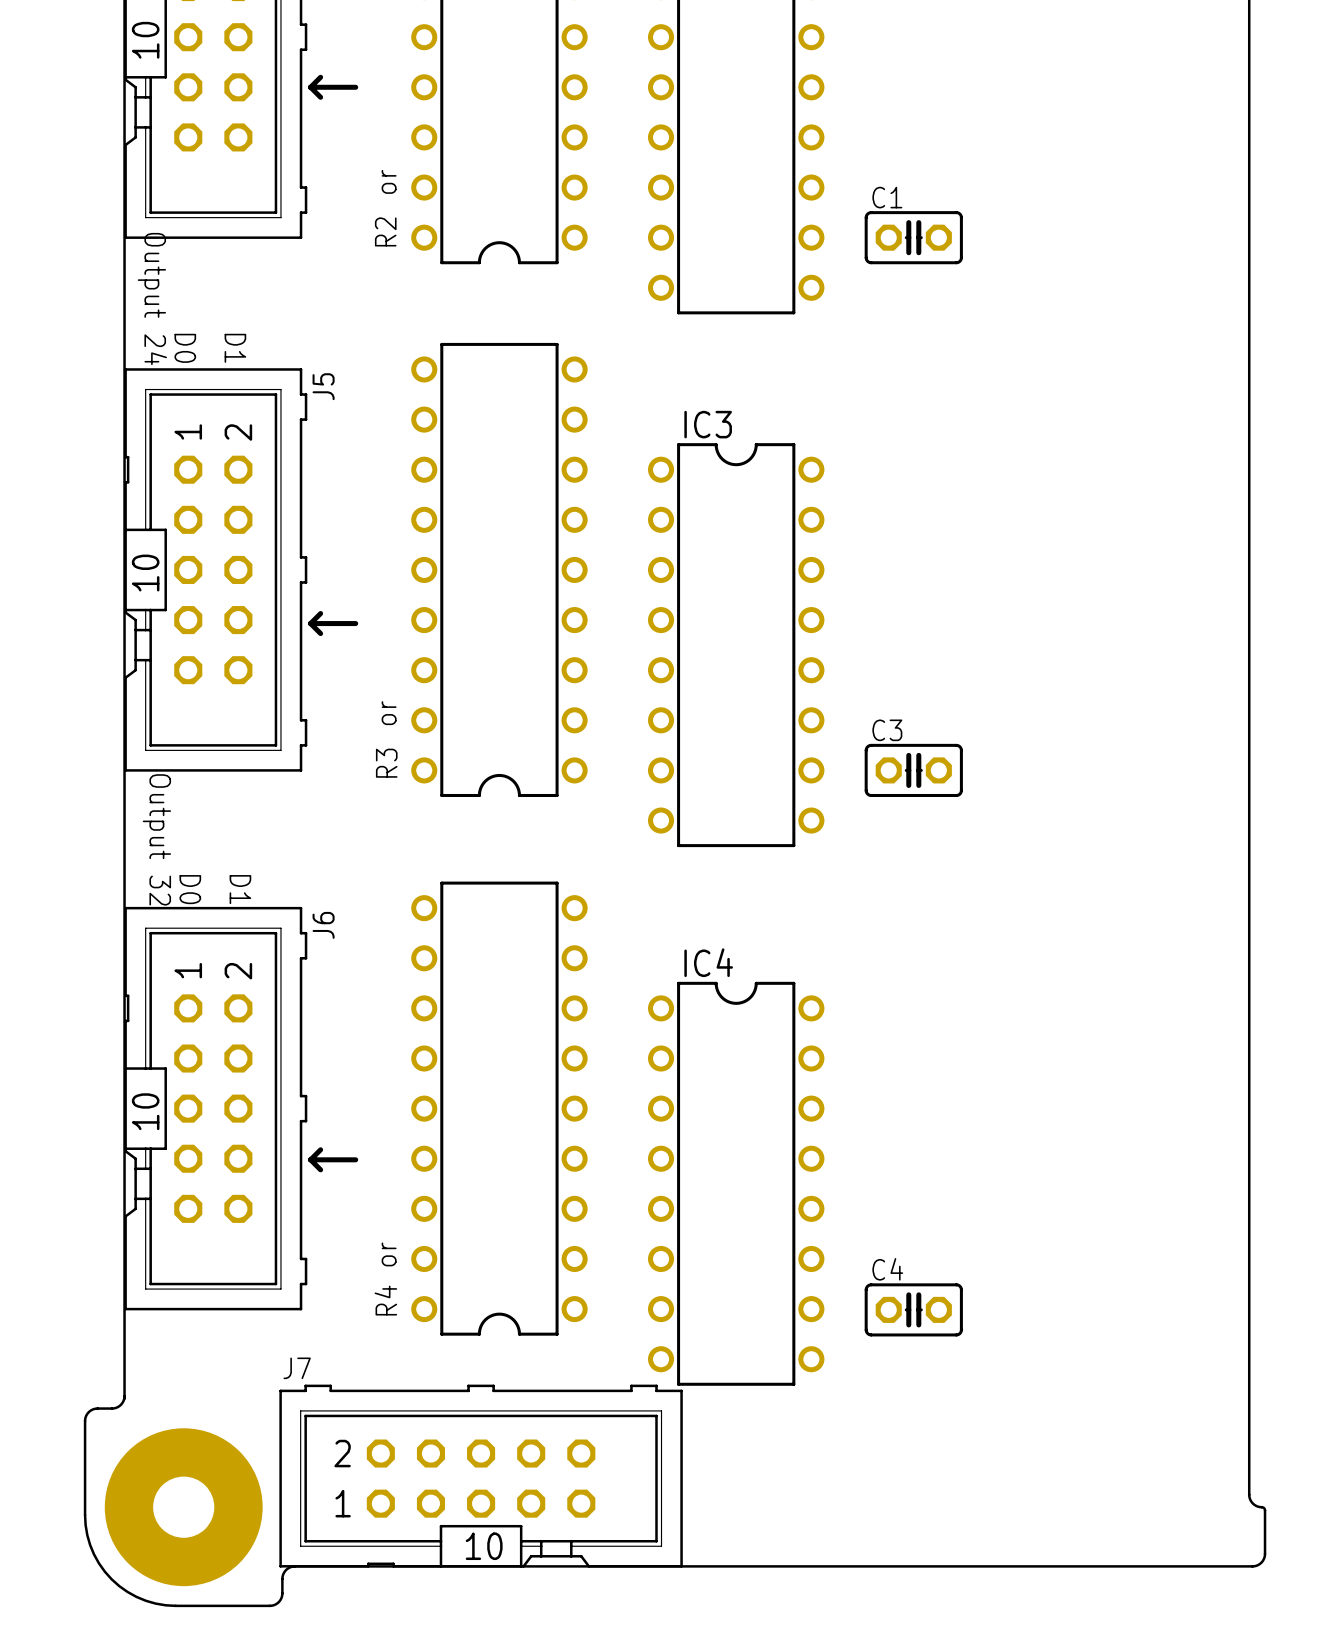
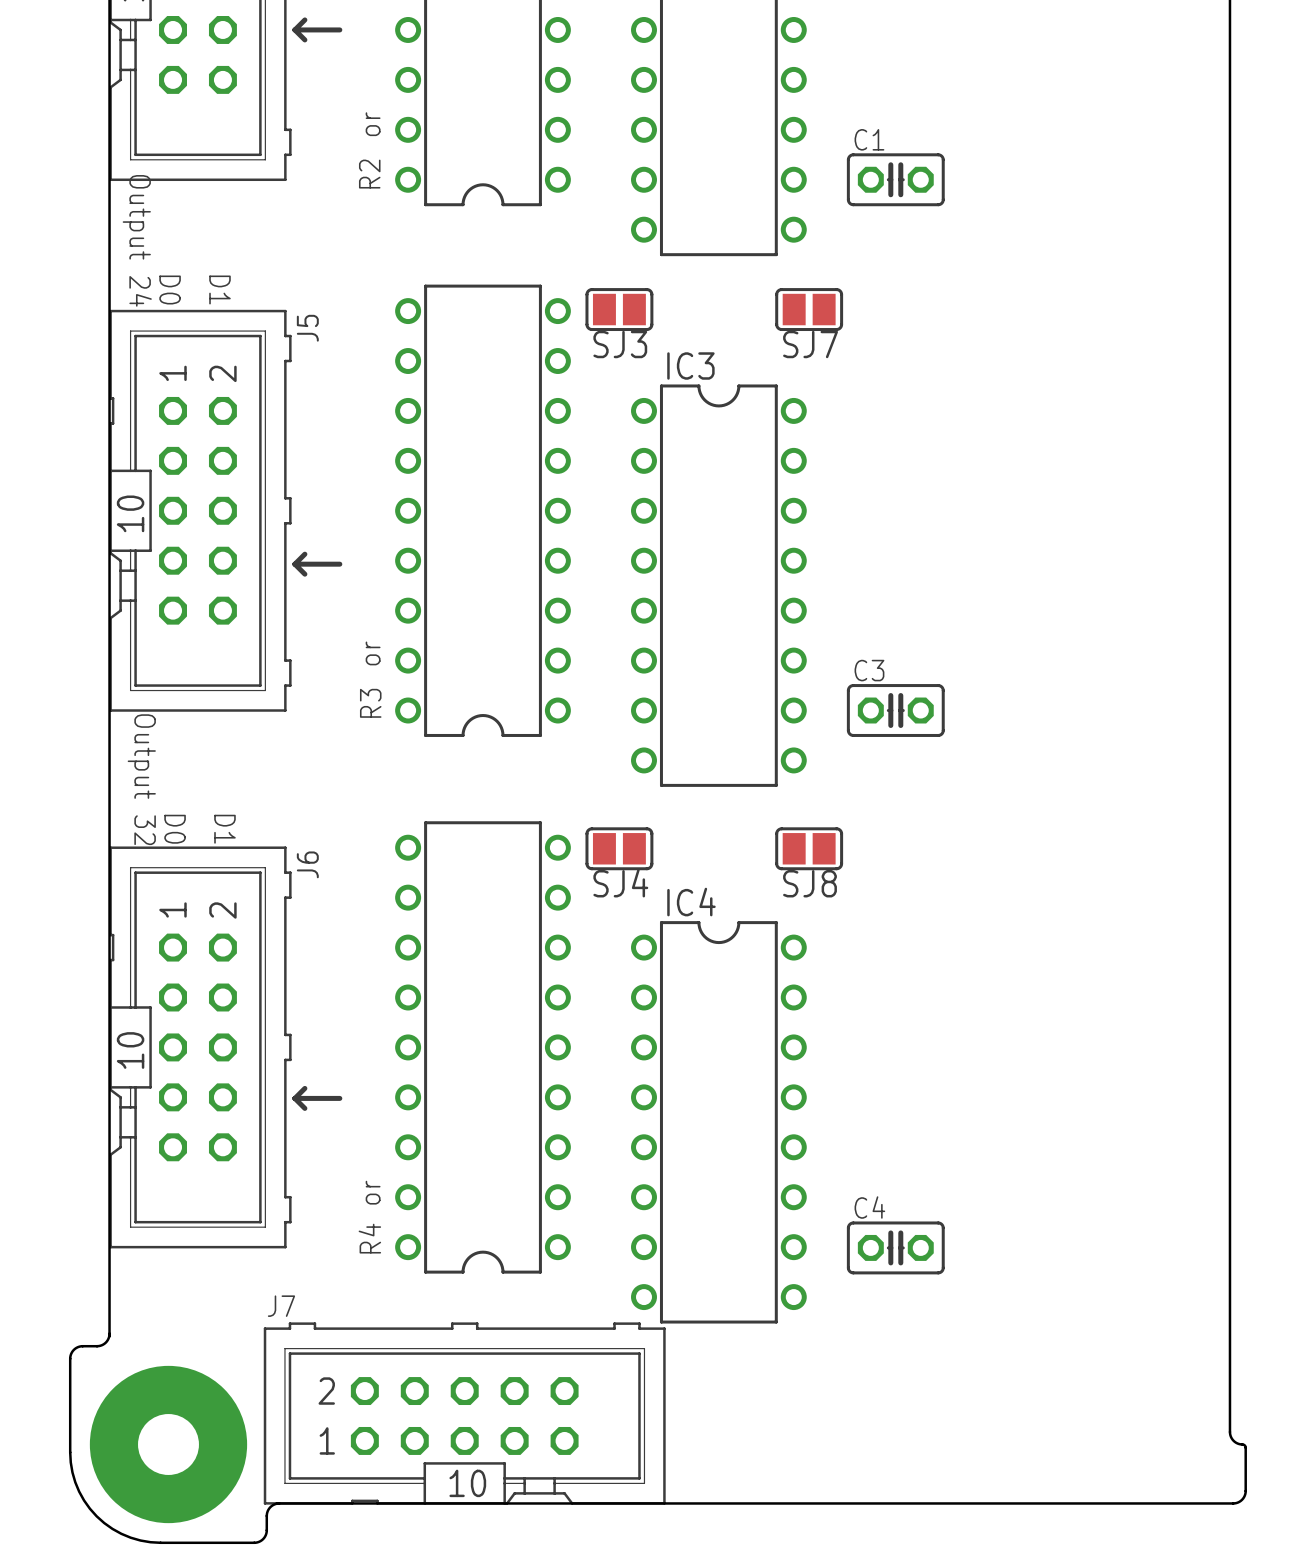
SJ3: none -> (619, 309)
SJ7: none -> (809, 309)
SJ4: none -> (619, 848)
SJ8: none -> (809, 848)

